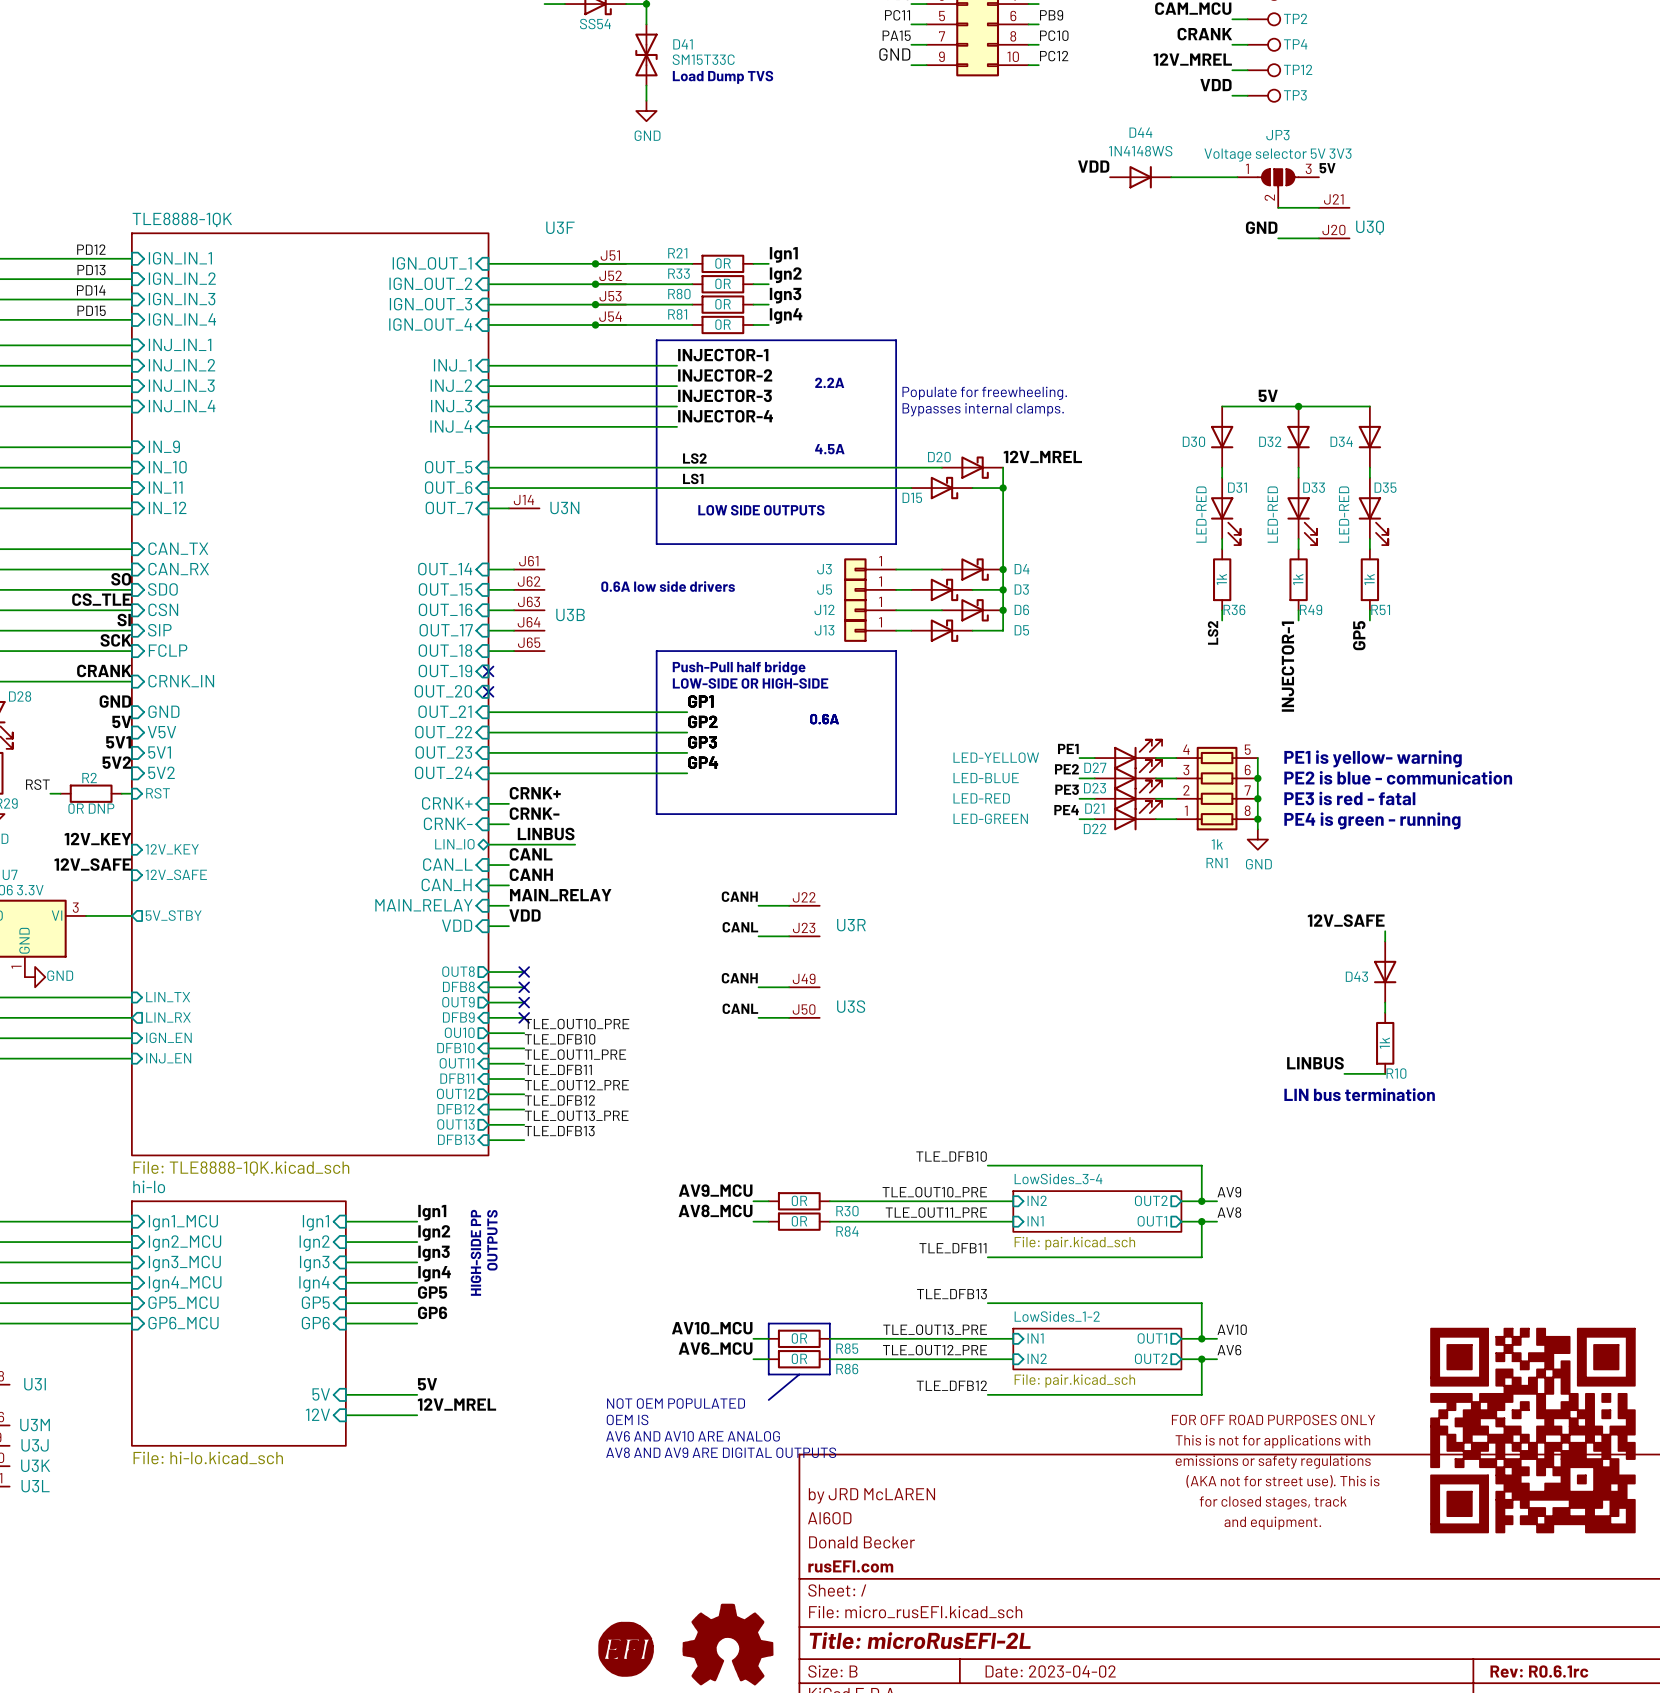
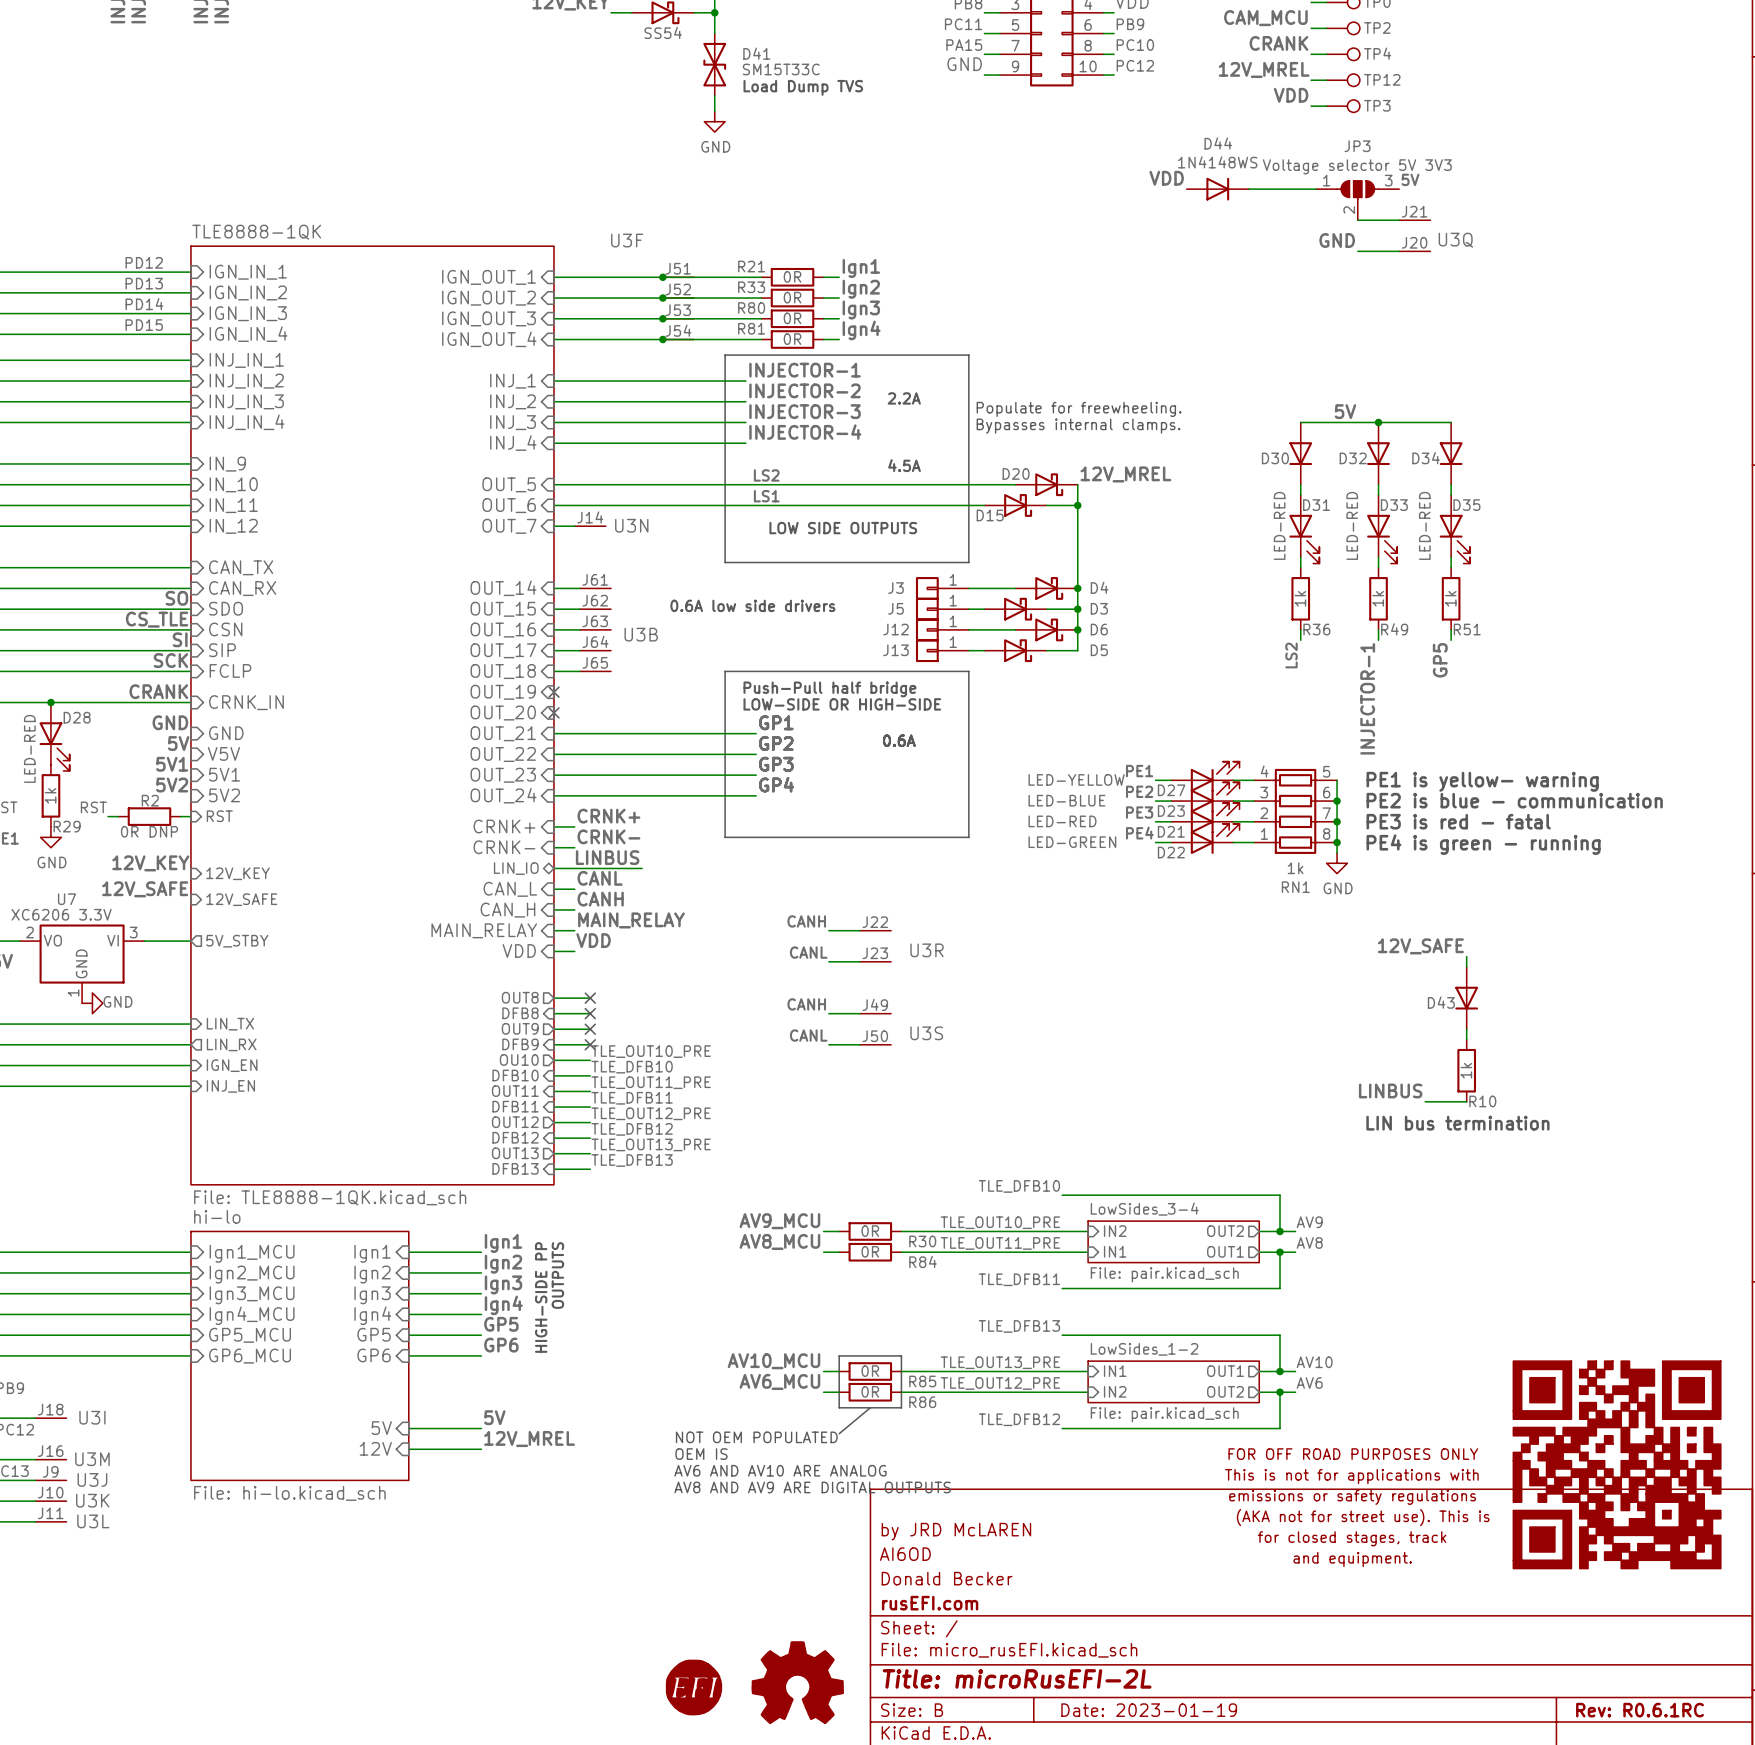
title block: Date: 2023-04-02 (1050, 1671) -> Date: 2023-01-19 (1149, 1710)
title block: Rev: R0.6.1rc (1539, 1671) -> Rev: R0.6.1RC (1640, 1710)

